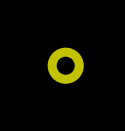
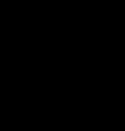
part: (65, 65) -> none

